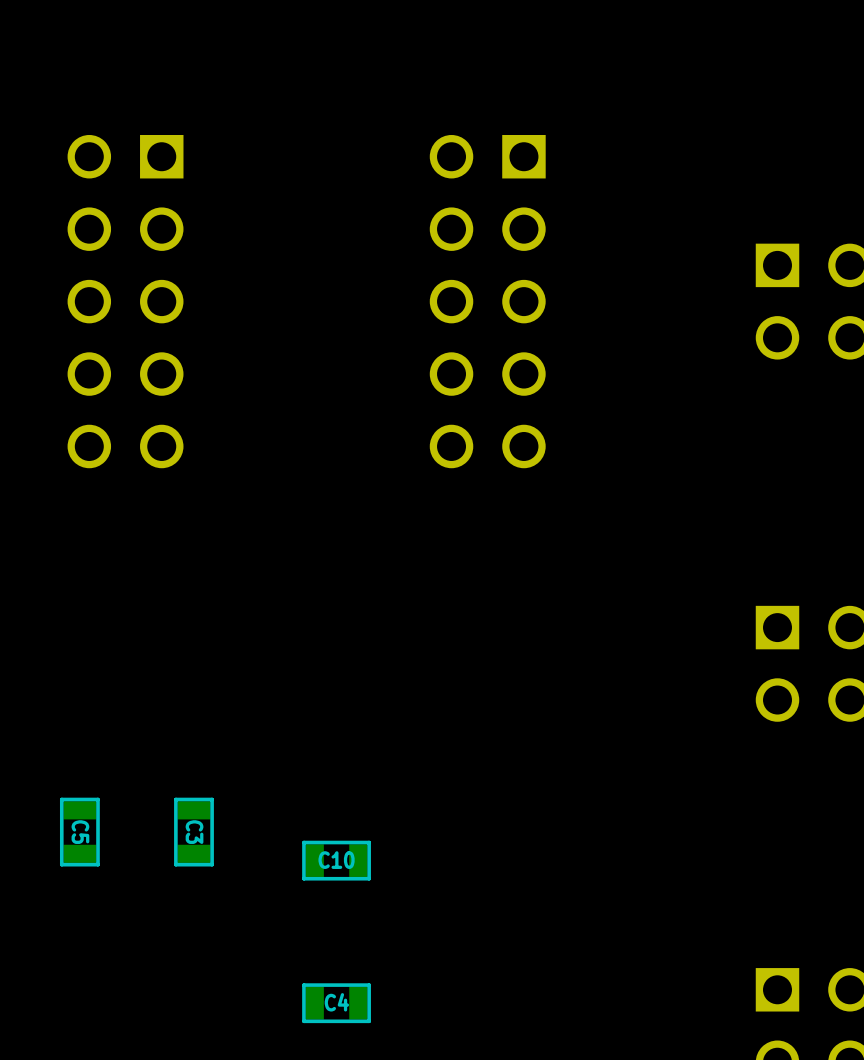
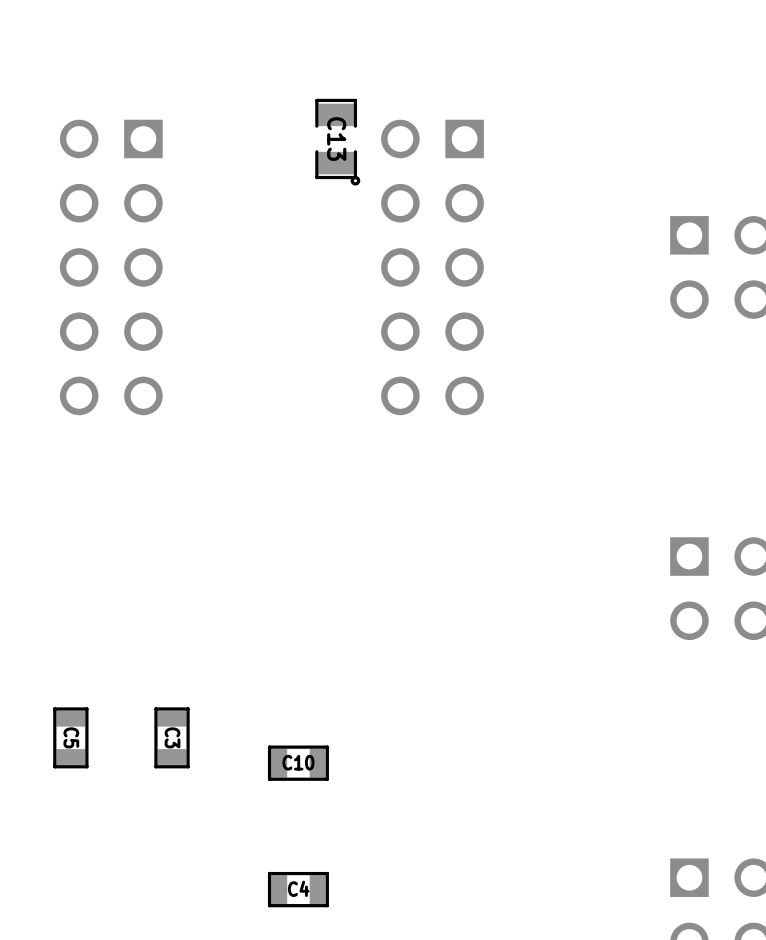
C13: none -> (337, 142)

